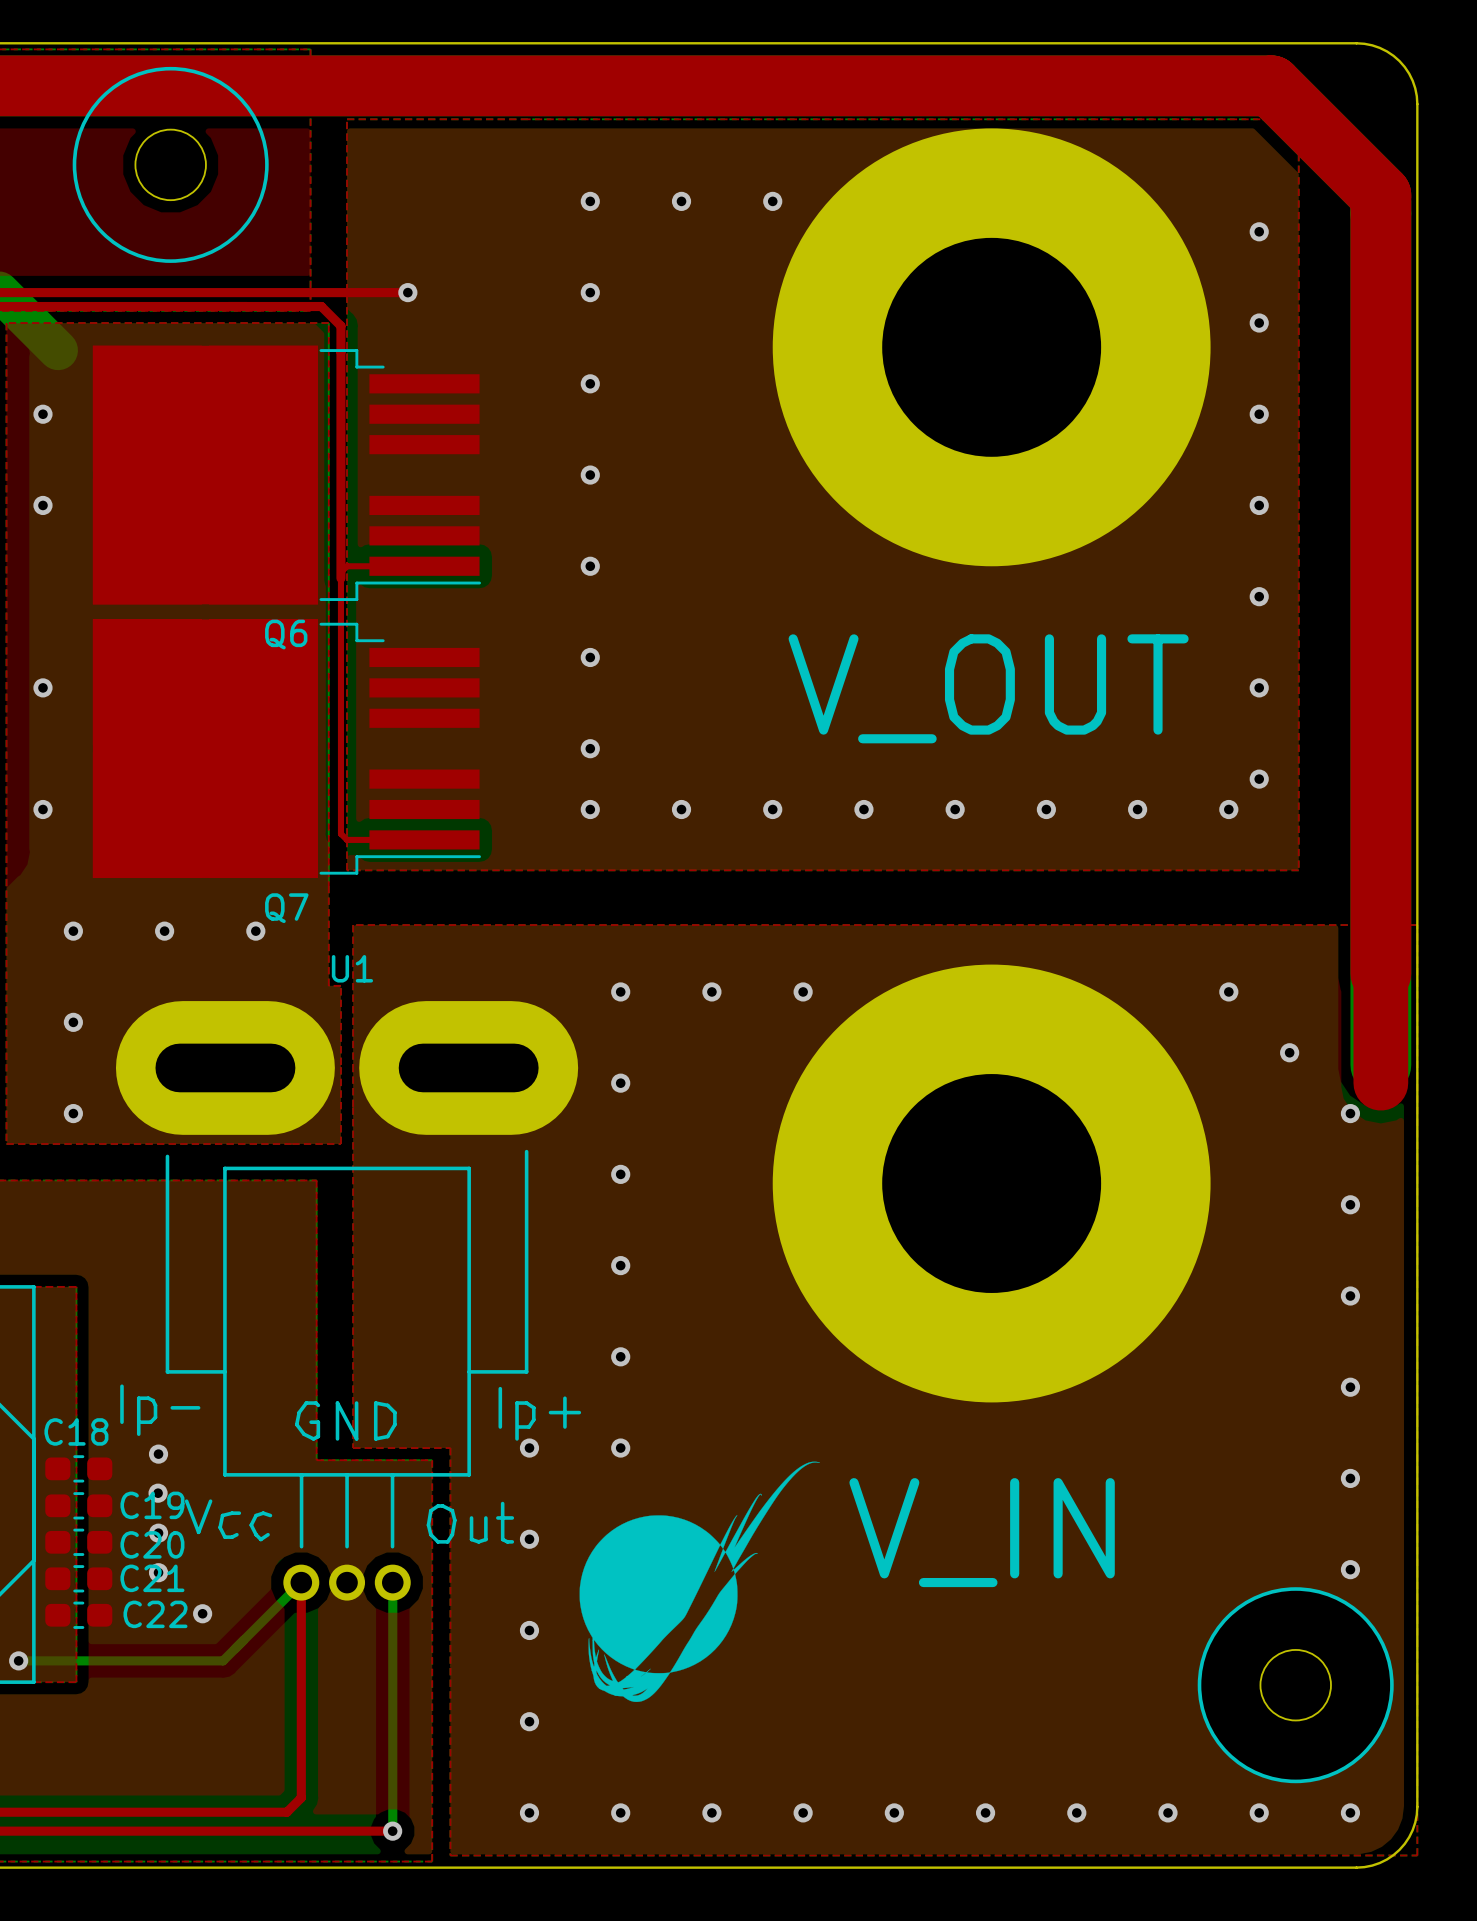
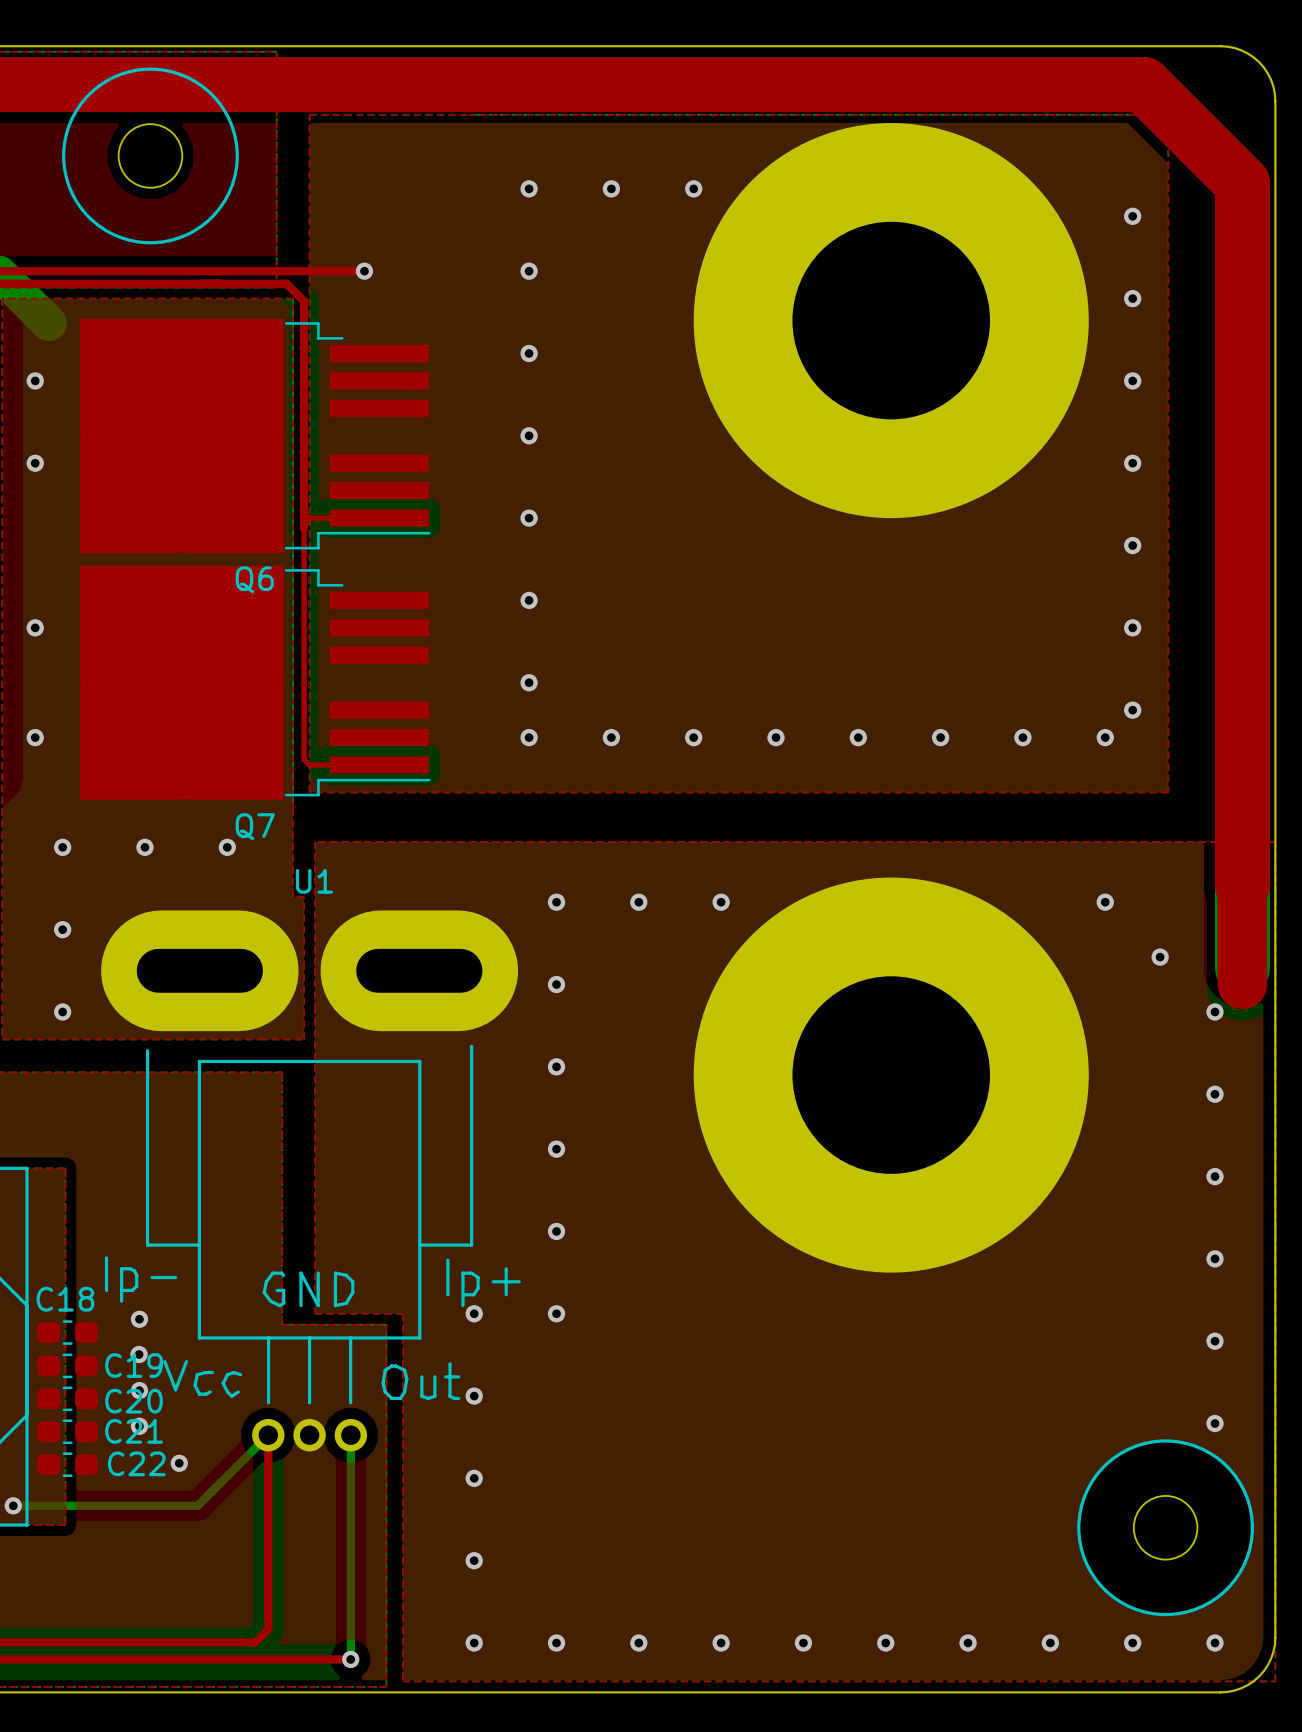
text: V_OUT (988, 688) -> none
drawing: [579, 1461, 820, 1703] -> none
text: V_IN (982, 1532) -> none

